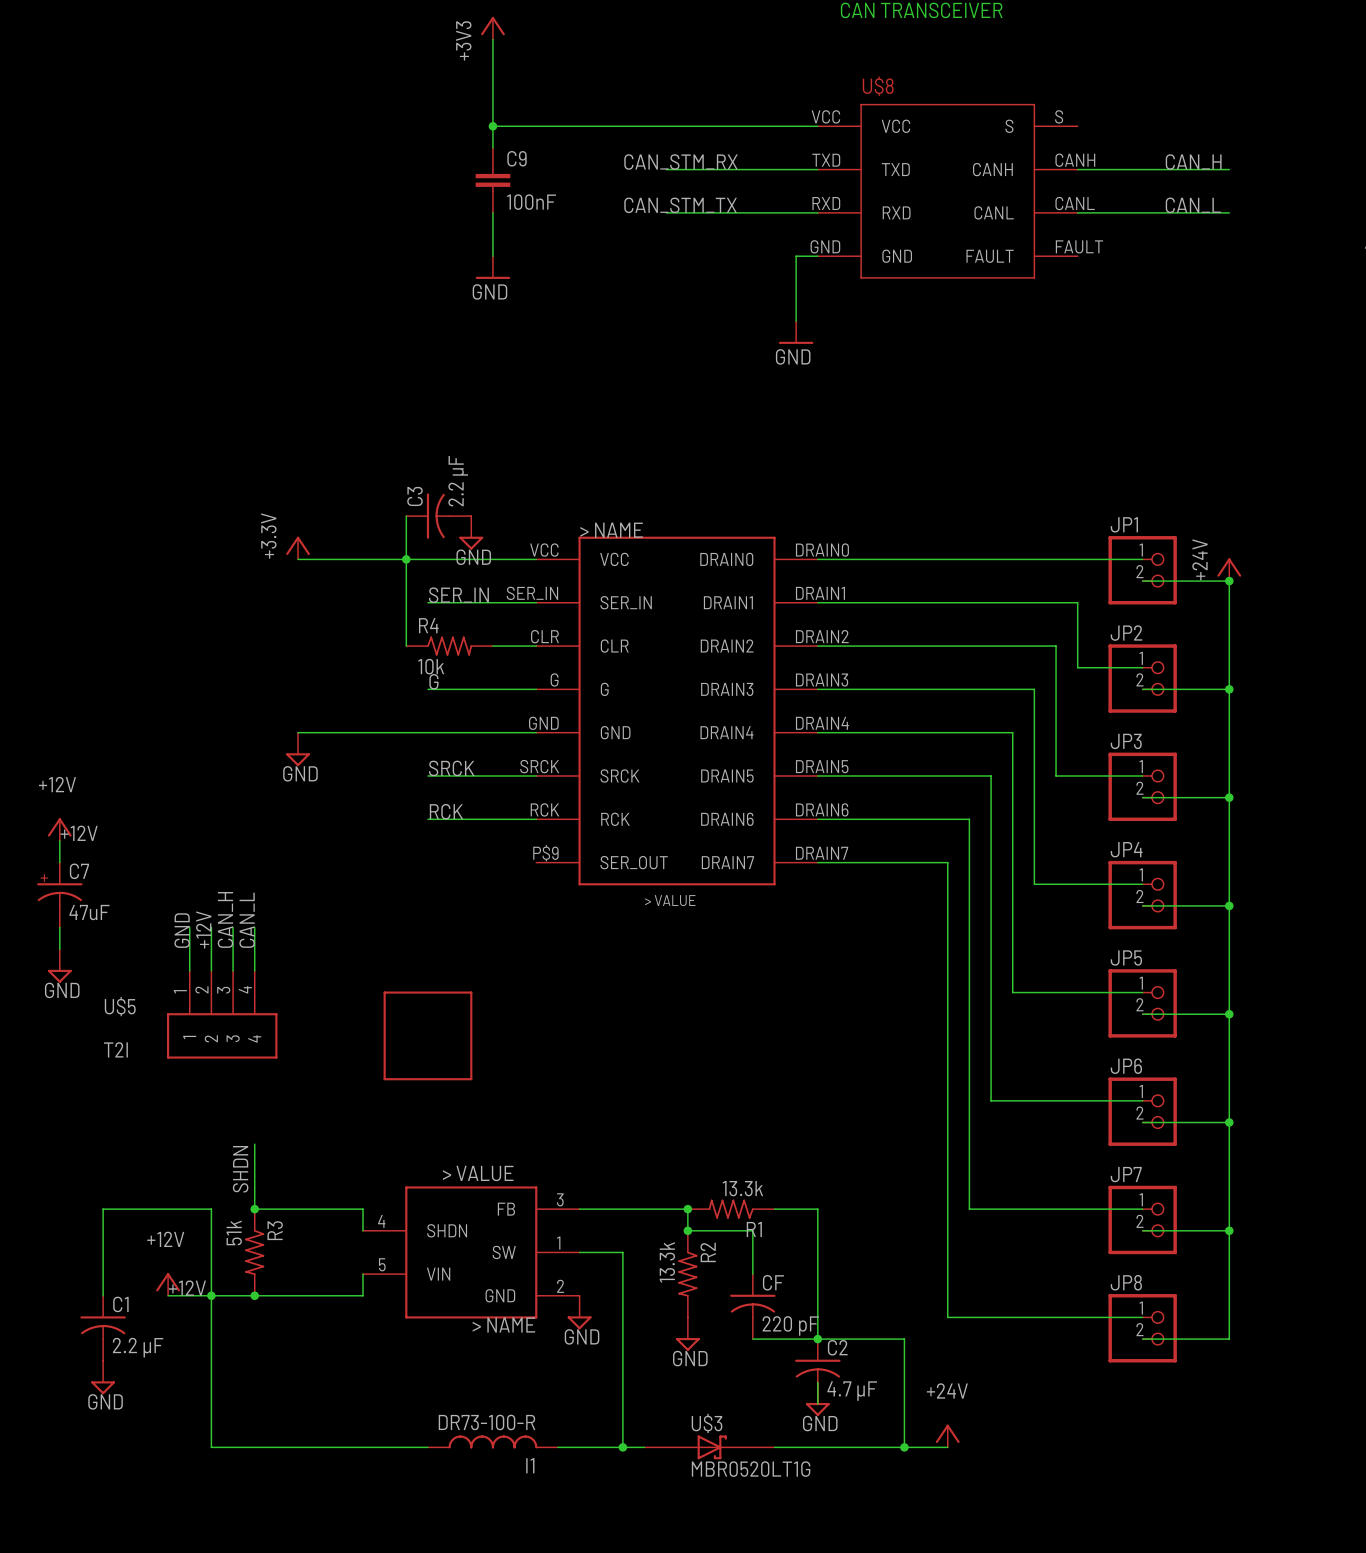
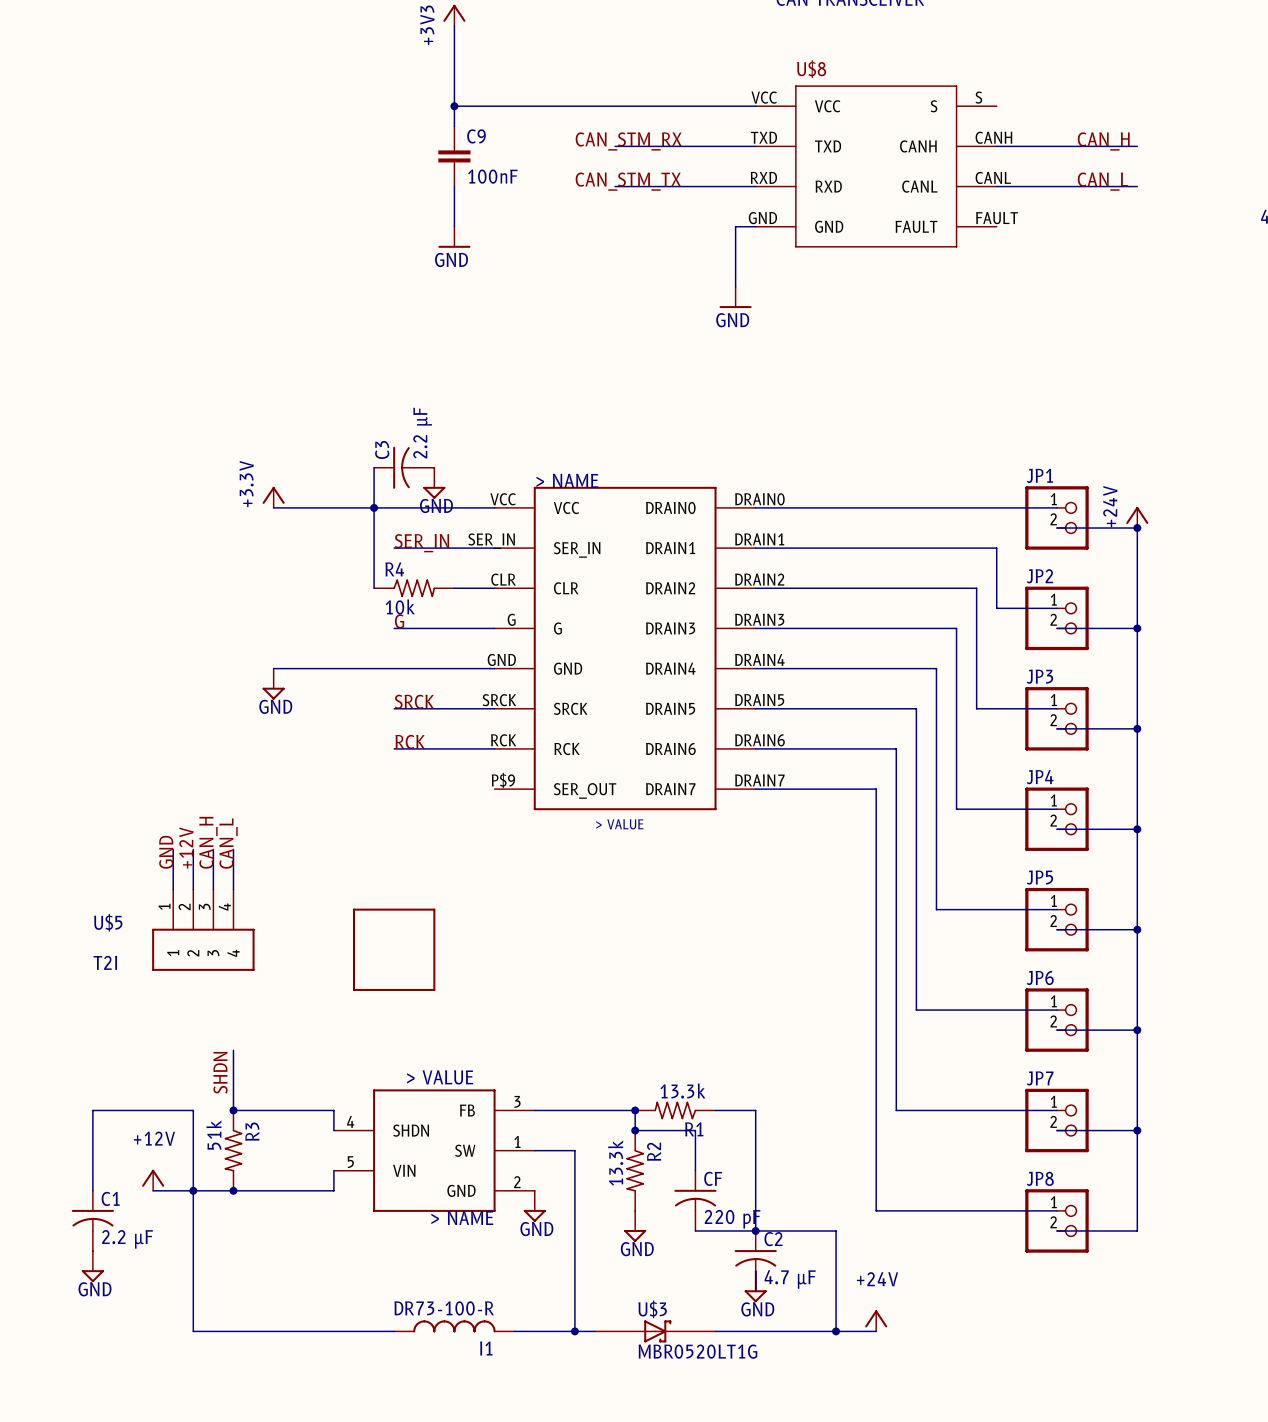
power symbol: +12V (59, 829) -> none
label: +12V (79, 833) -> none
wire: (59, 840) (59, 862) -> none
C7: 47uF (59, 895) -> none
wire: (59, 927) (59, 949) -> none
power symbol: GND (59, 966) -> none
label: +12V (187, 1288) -> none

